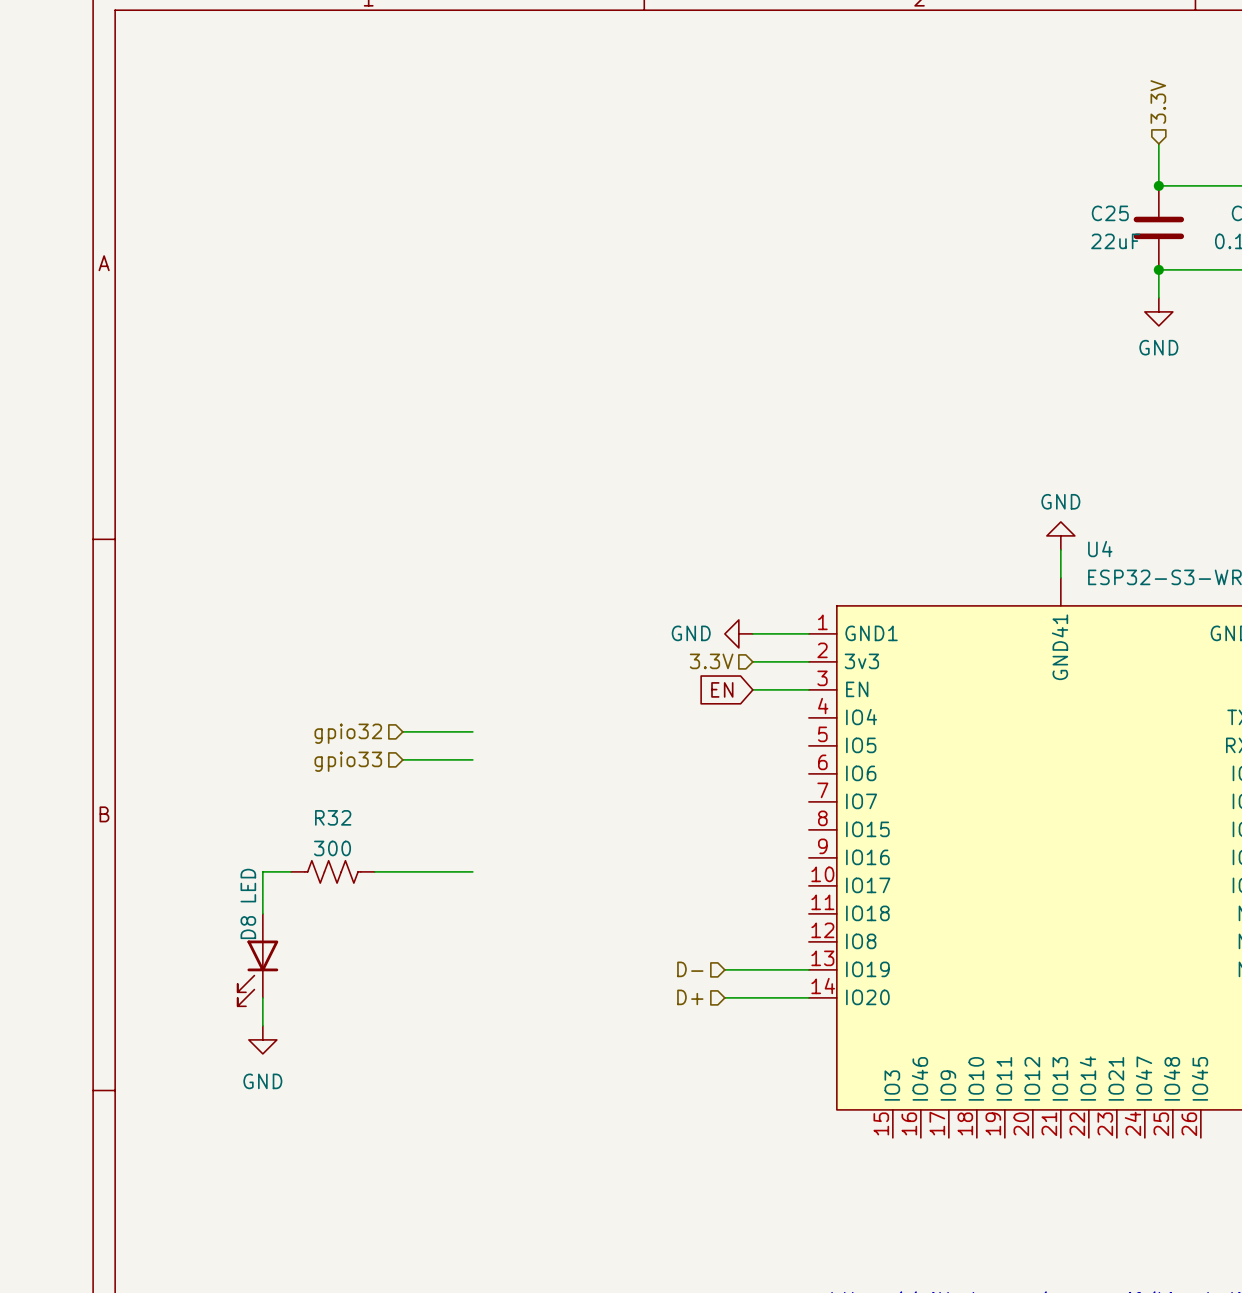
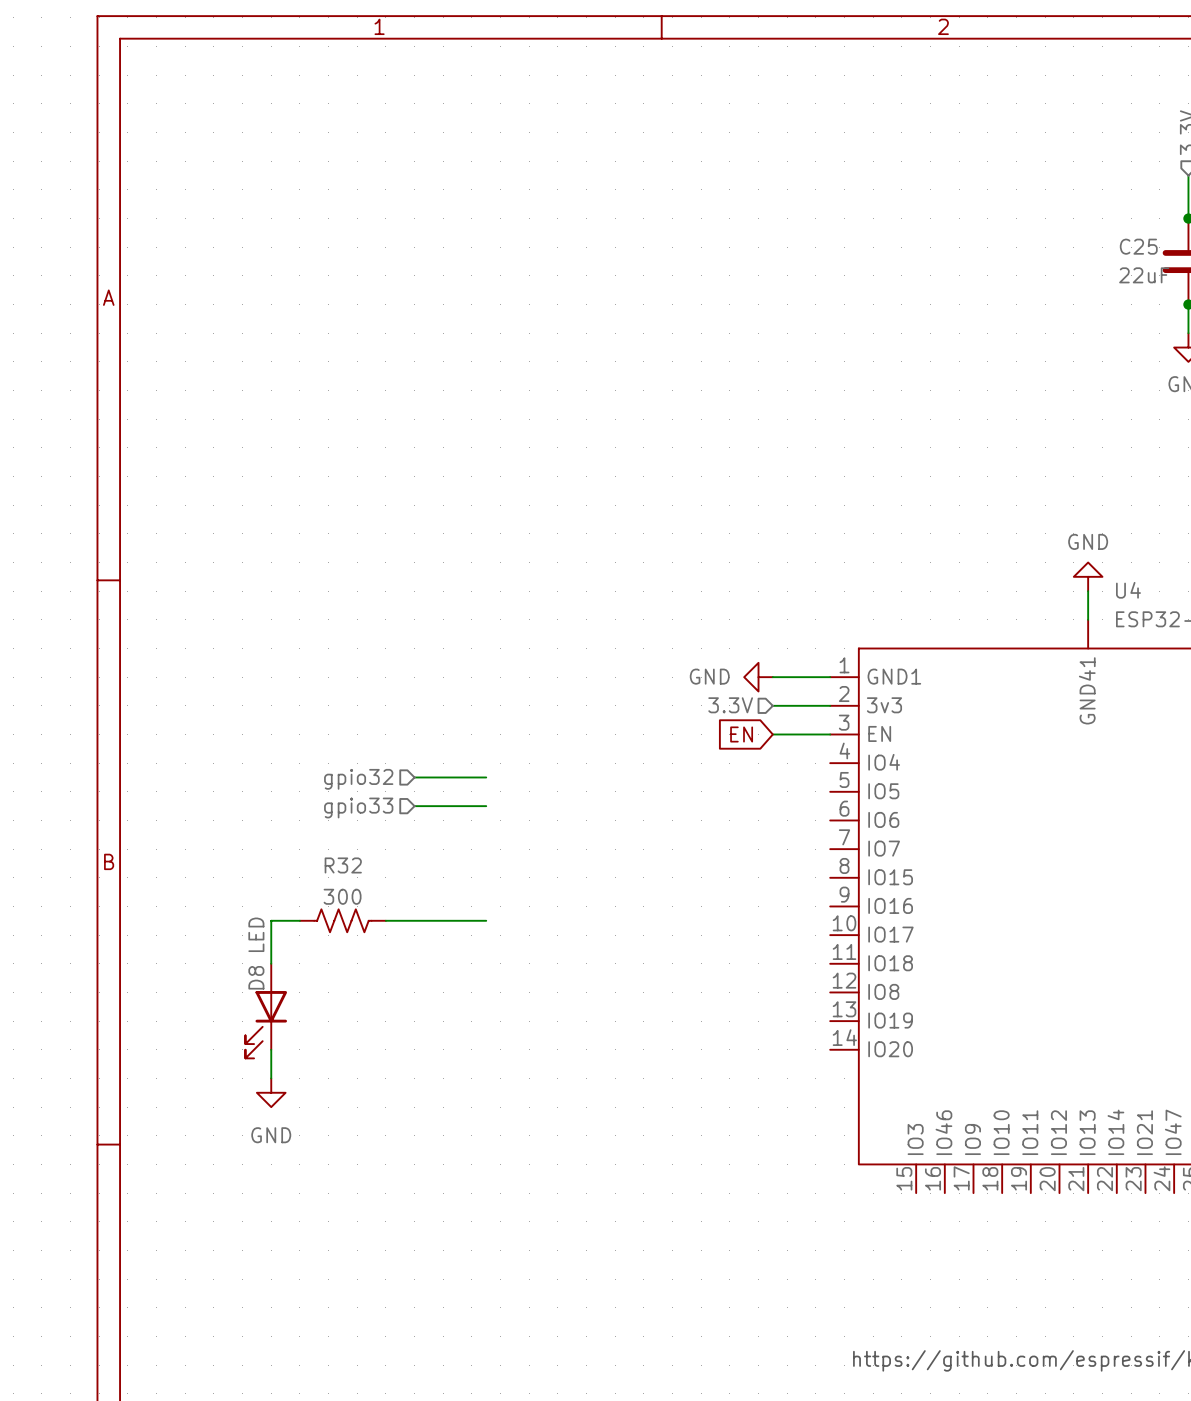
hierarchical label: D- (690, 969) -> none
wire: (724, 969) (808, 969) -> none
hierarchical label: D+ (690, 997) -> none
wire: (724, 997) (808, 997) -> none

